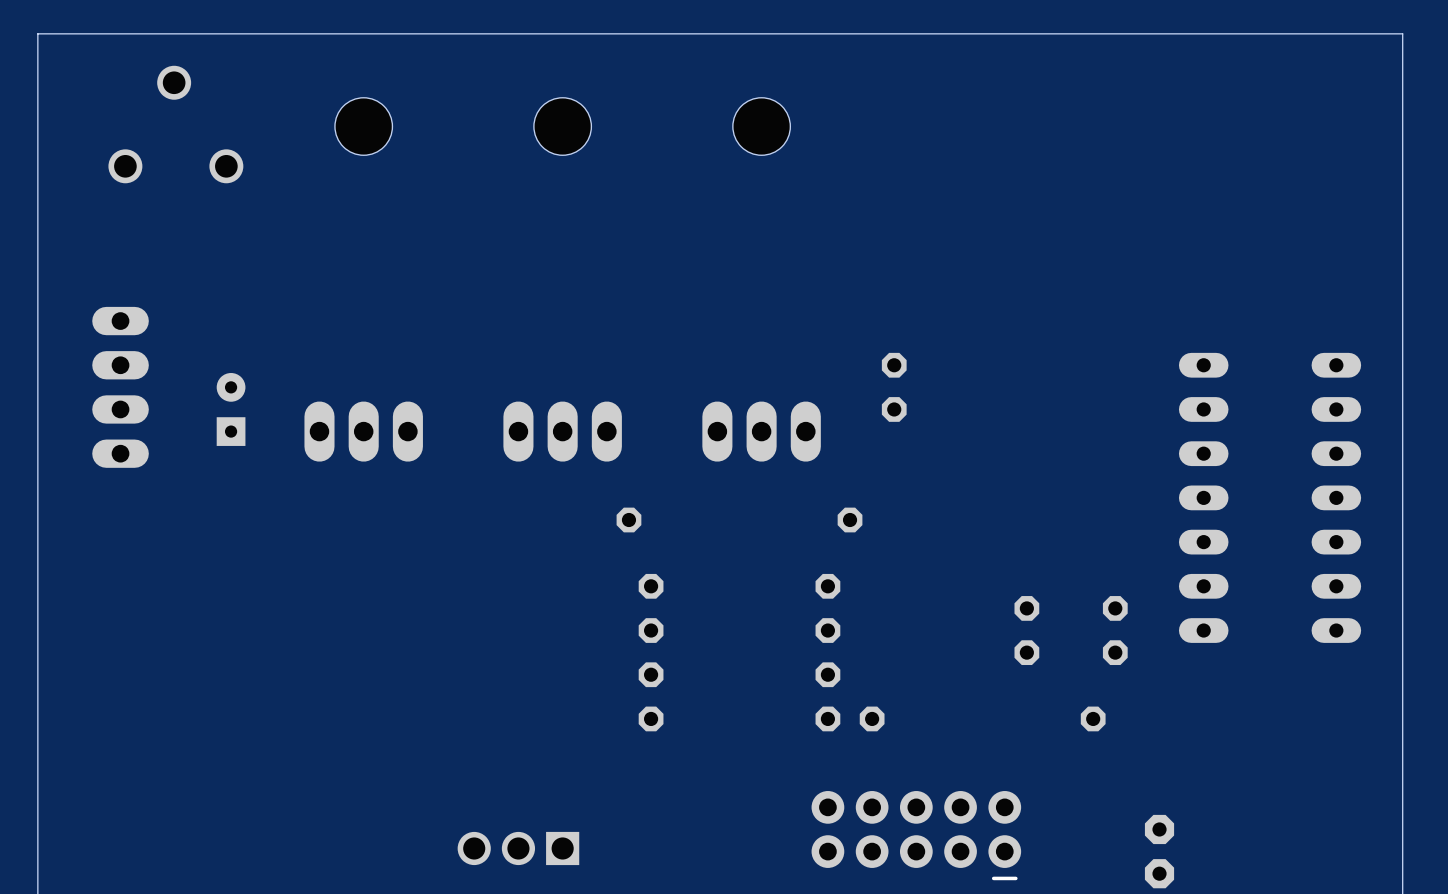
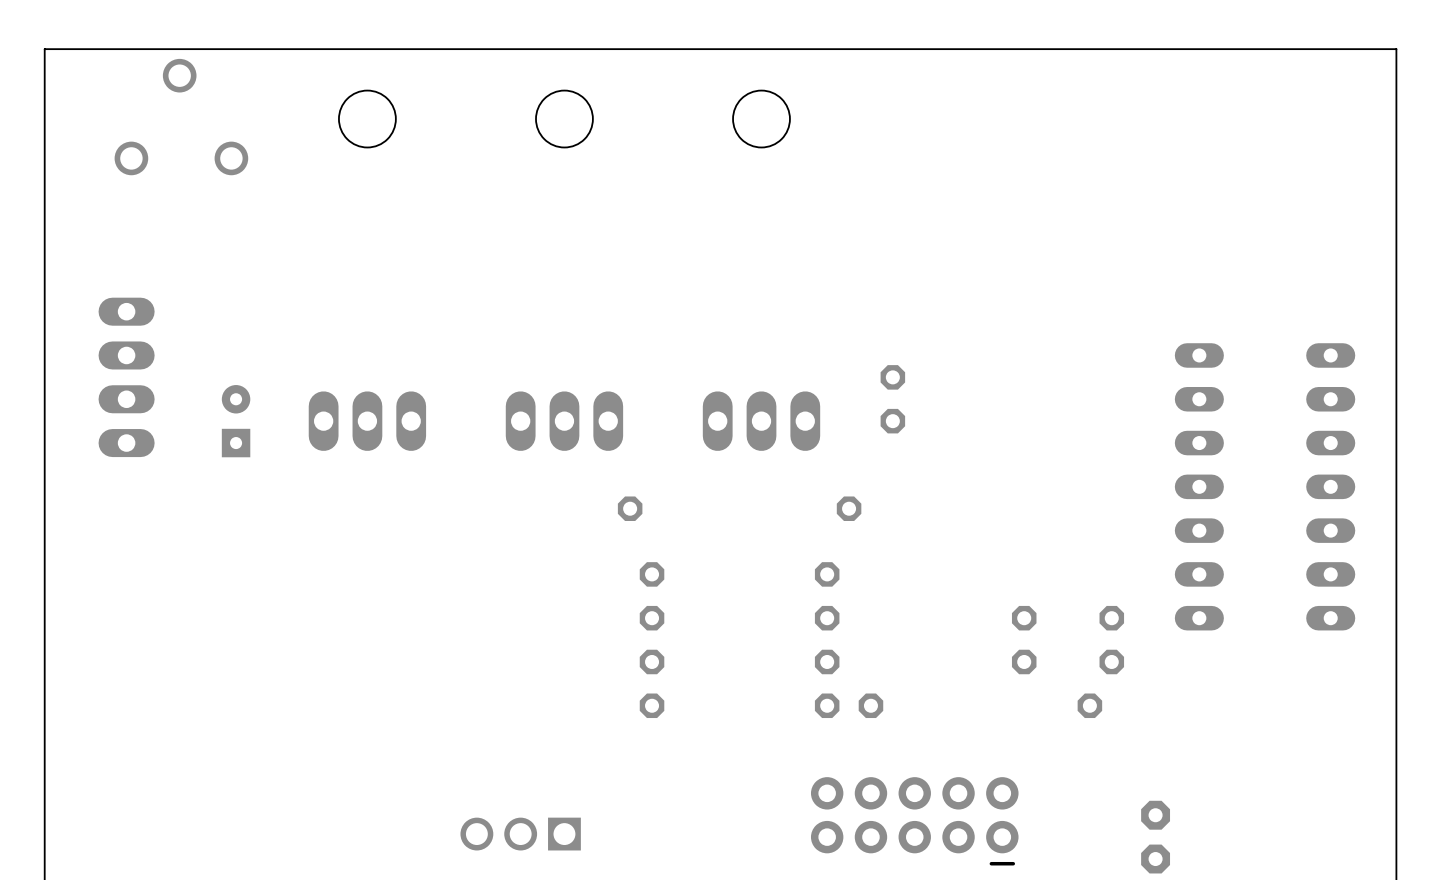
board edge: (1402, 55) (1402, 33) (37, 33) (37, 55) -> (1396, 49) (44, 49)
part position: (894, 387) -> (892, 399)
part position: (231, 409) -> (236, 421)
part position: (1026, 630) -> (1024, 640)
part position: (1115, 630) -> (1111, 640)

